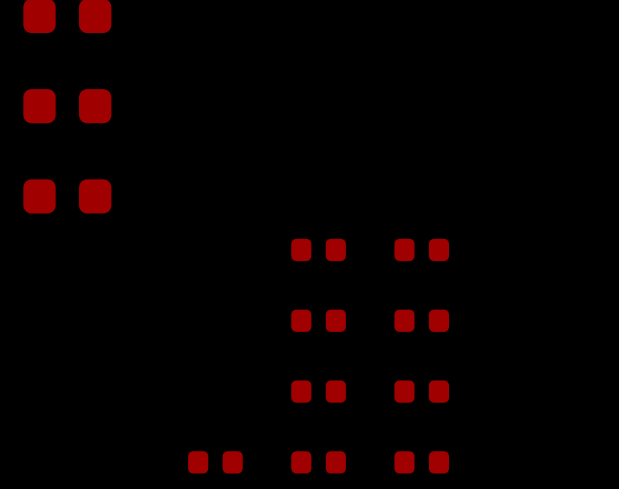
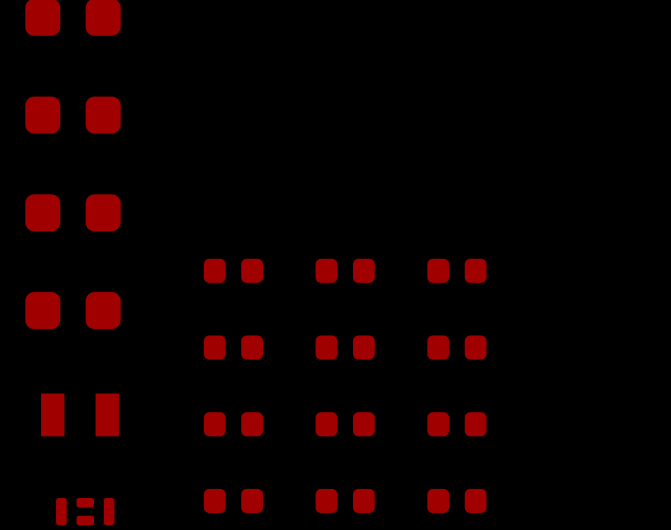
part: none -> (233, 270)
part: none -> (72, 310)
part: none -> (233, 347)
part: none -> (79, 414)
part: none -> (233, 424)
part: none -> (85, 511)

